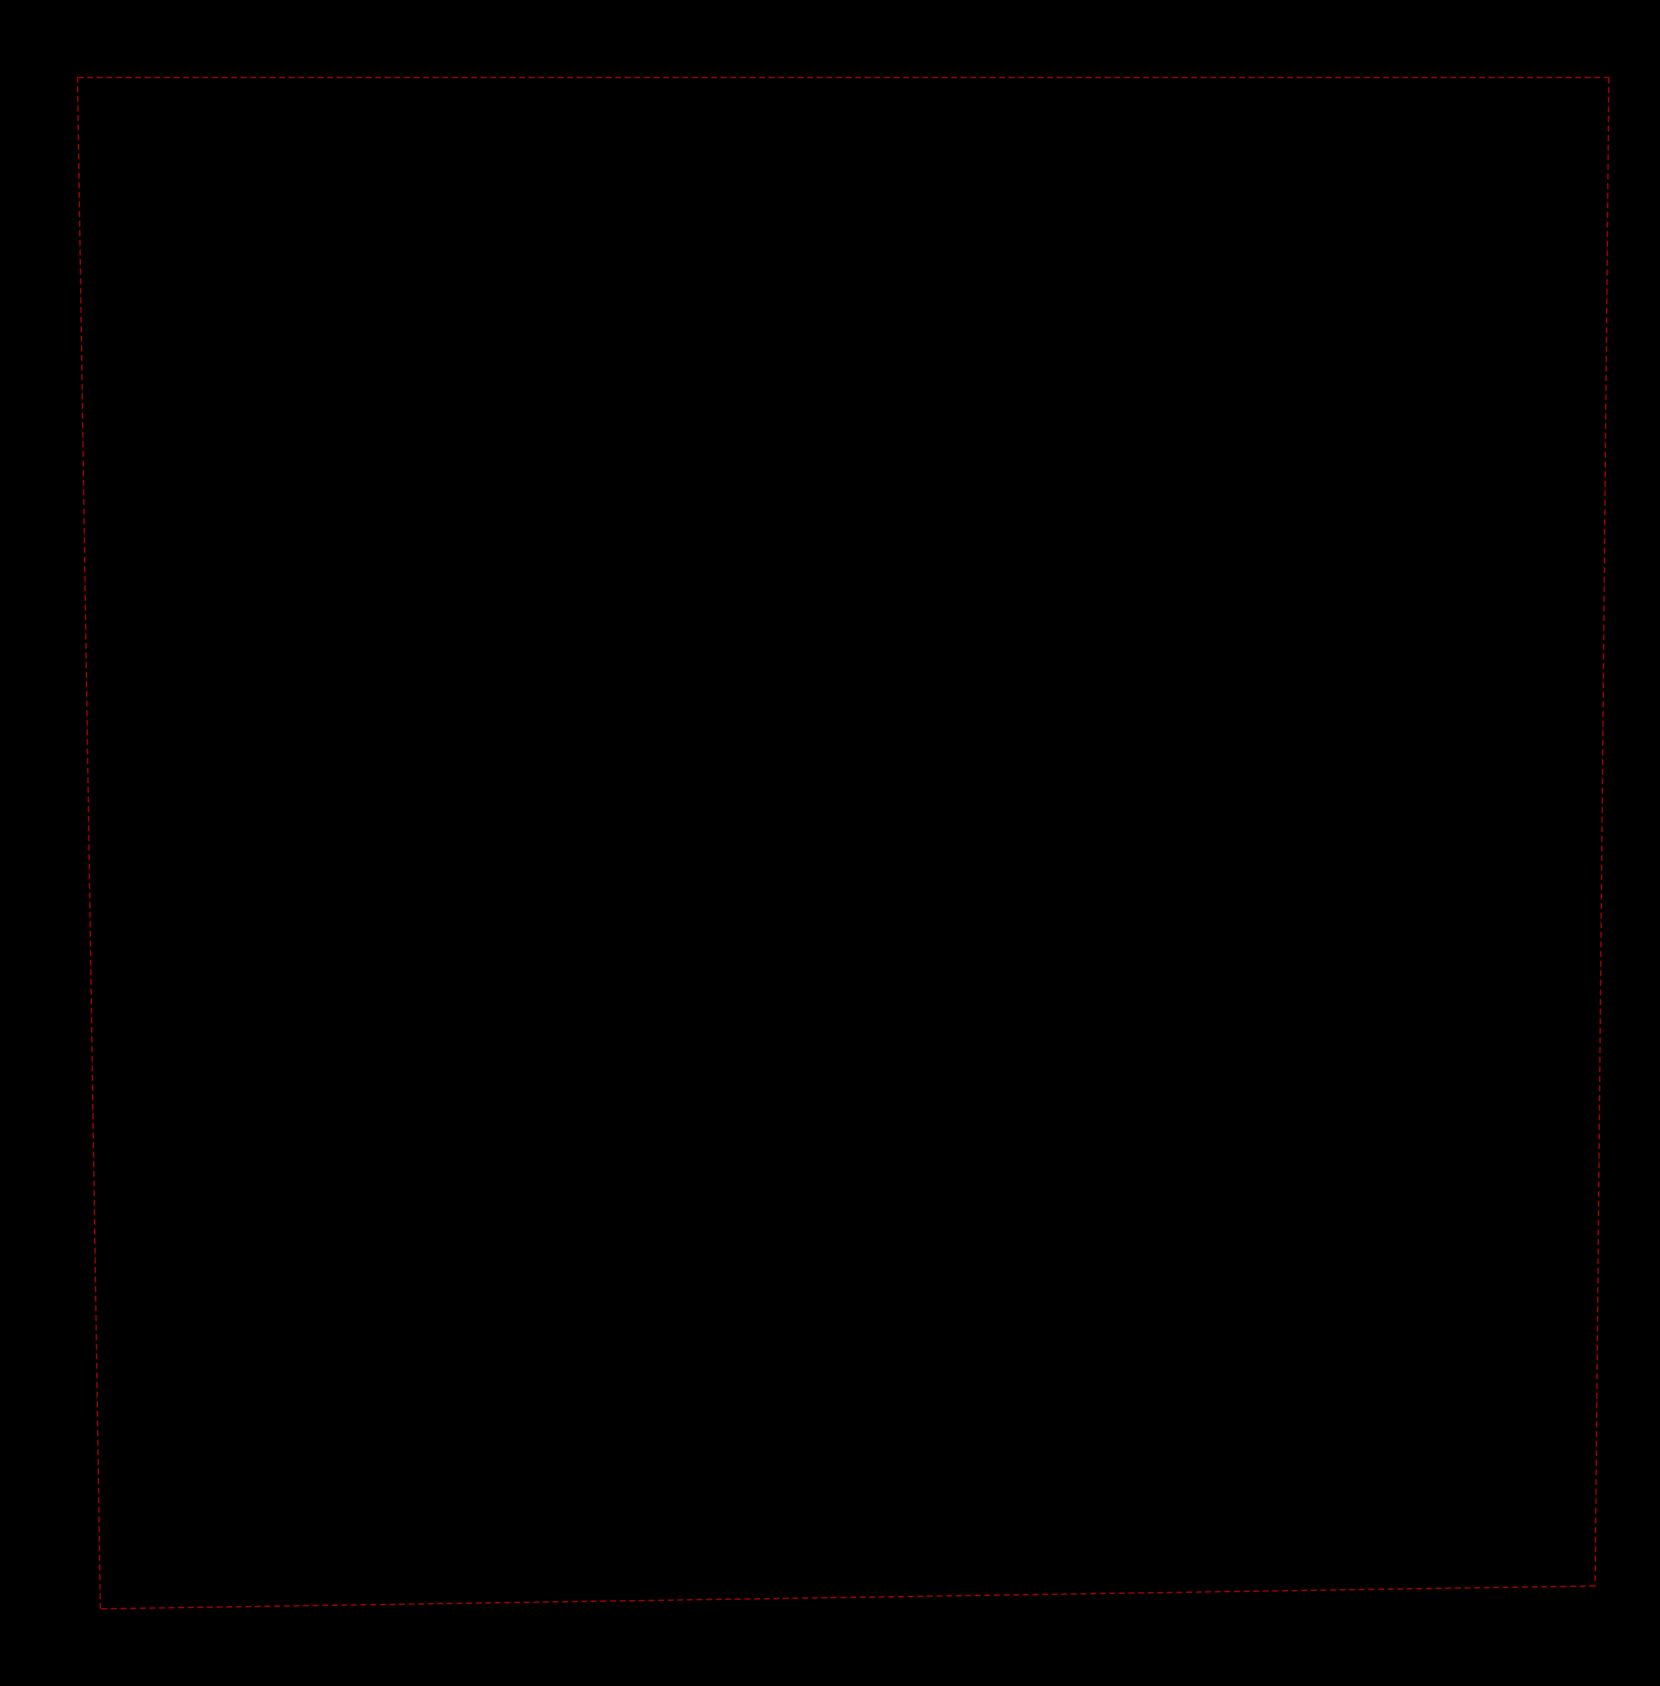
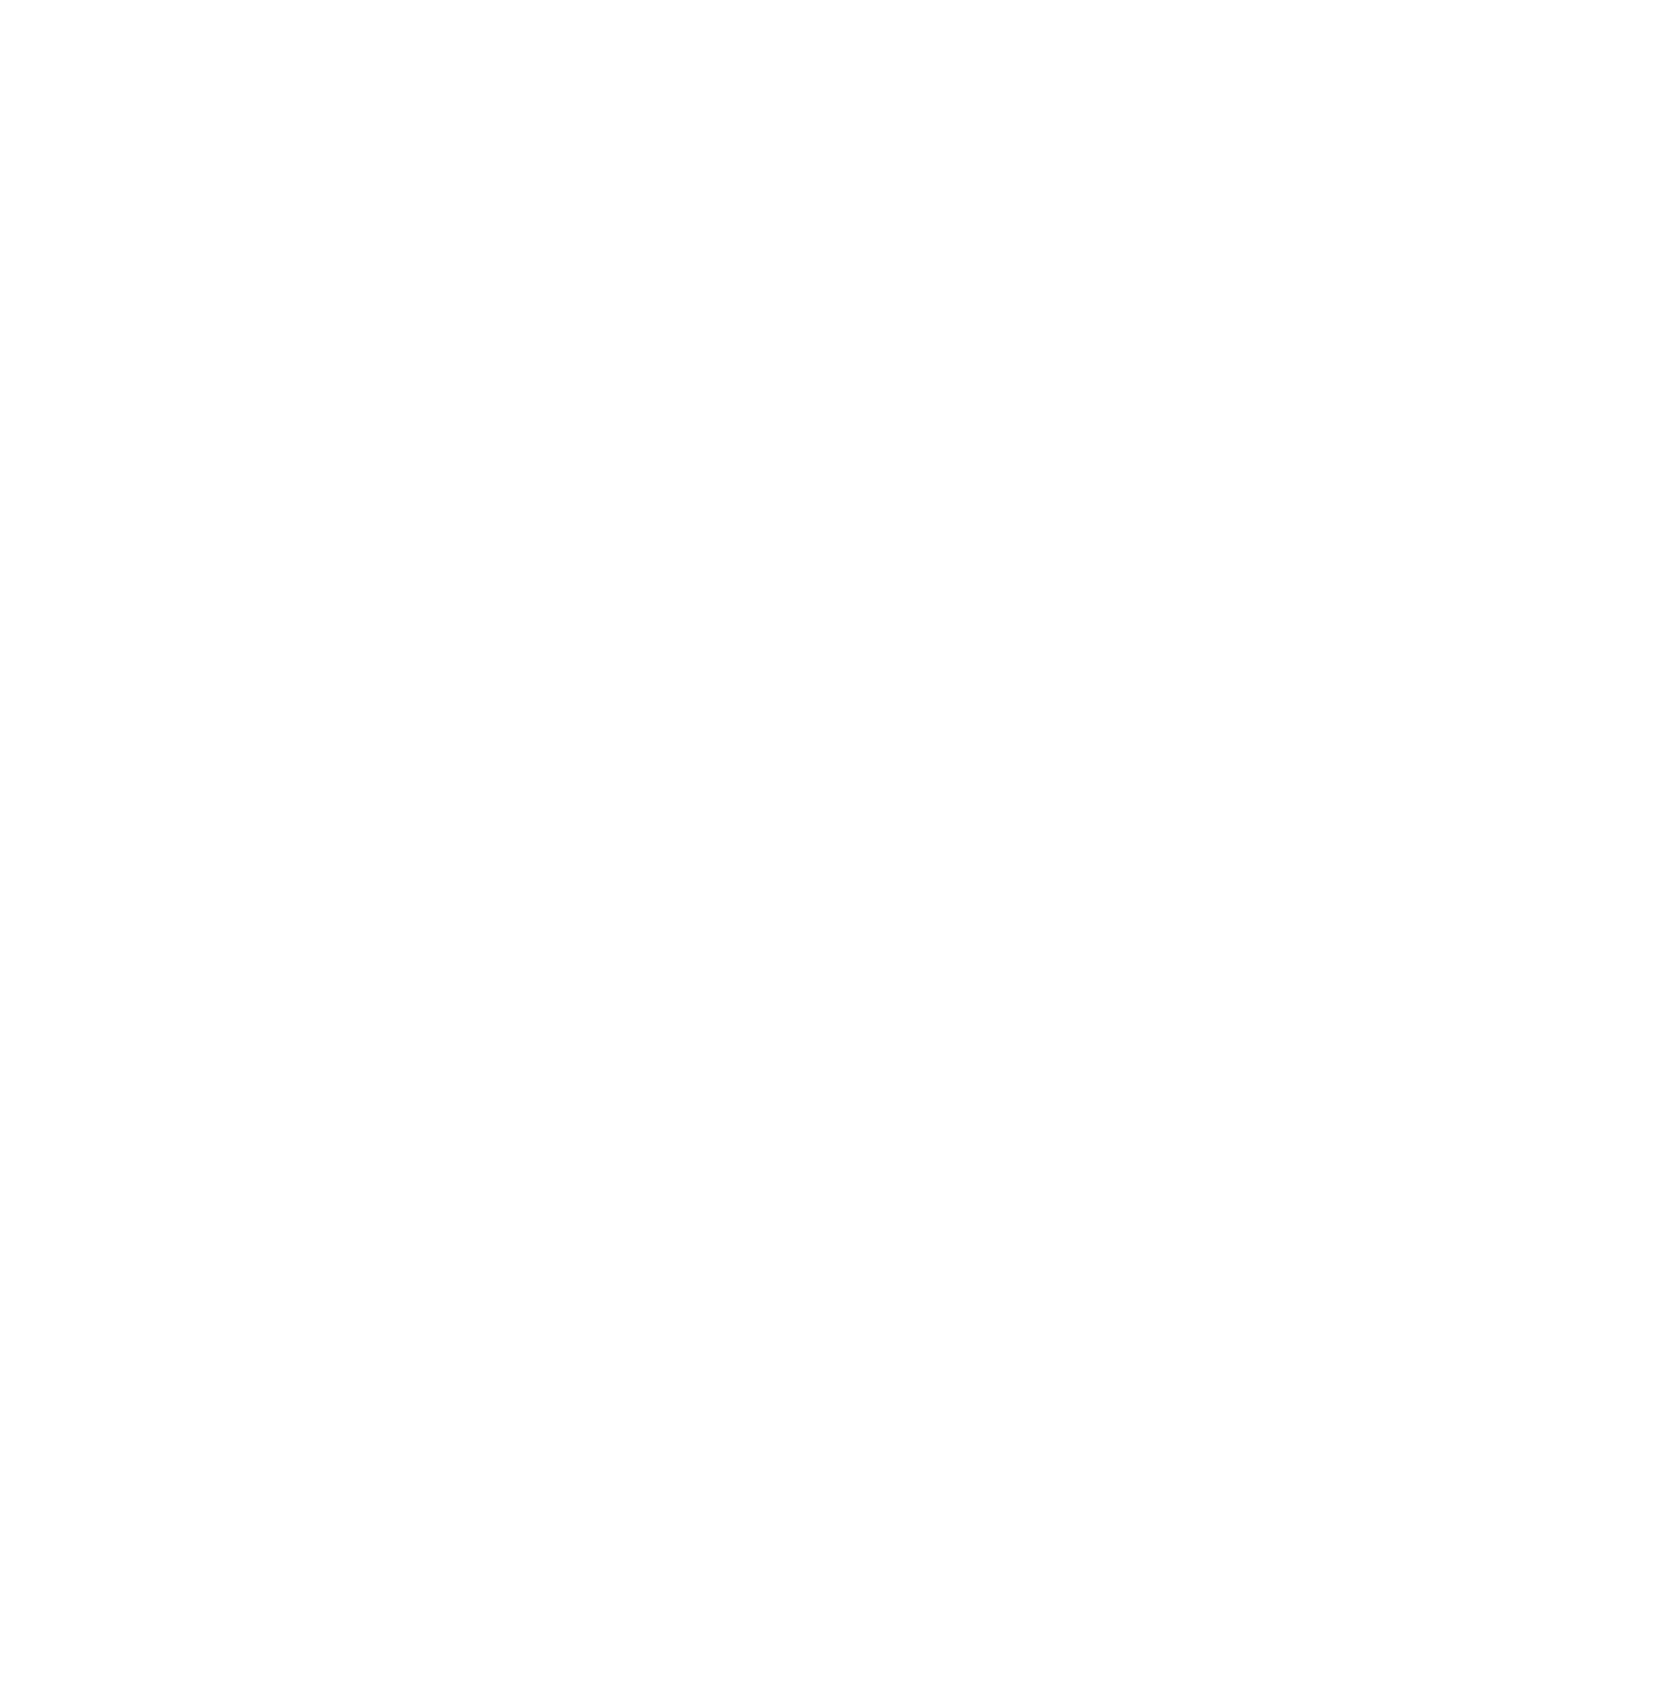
zone outline: (77, 77) (100, 1608) (1595, 1585) (1608, 77) (77, 77) -> none

